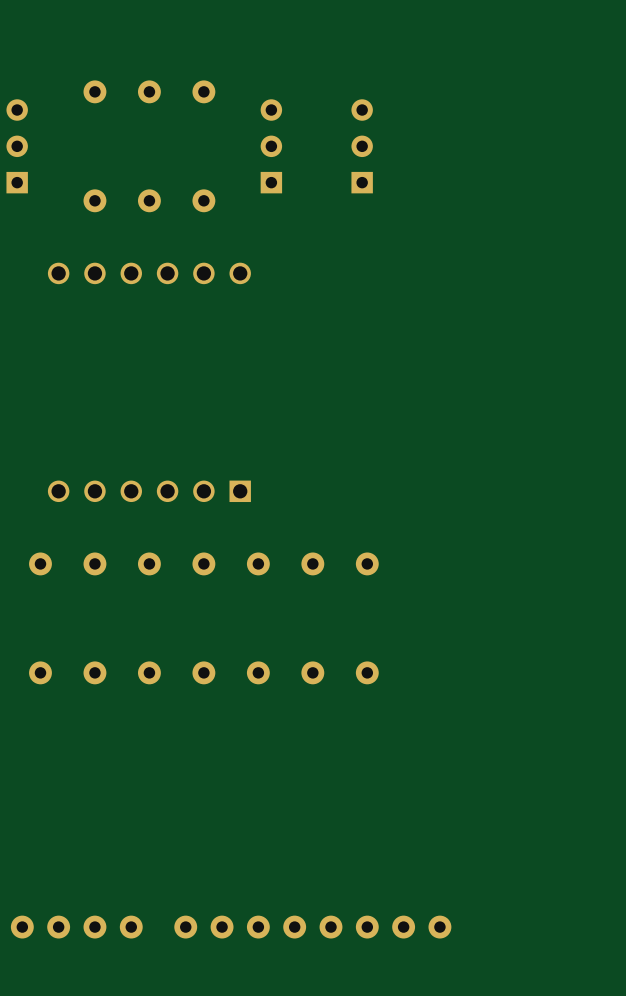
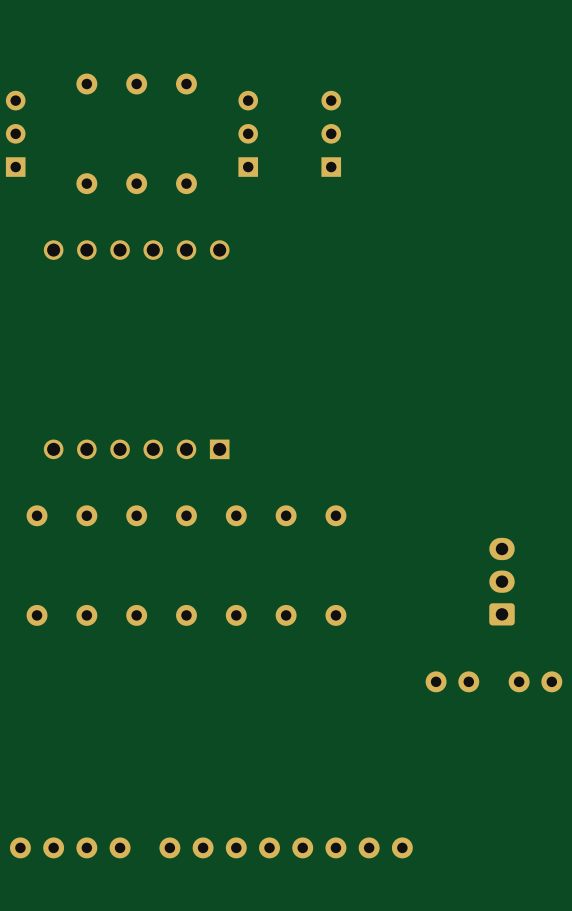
part: none -> (502, 581)
part: none -> (452, 681)
part: none -> (535, 681)

